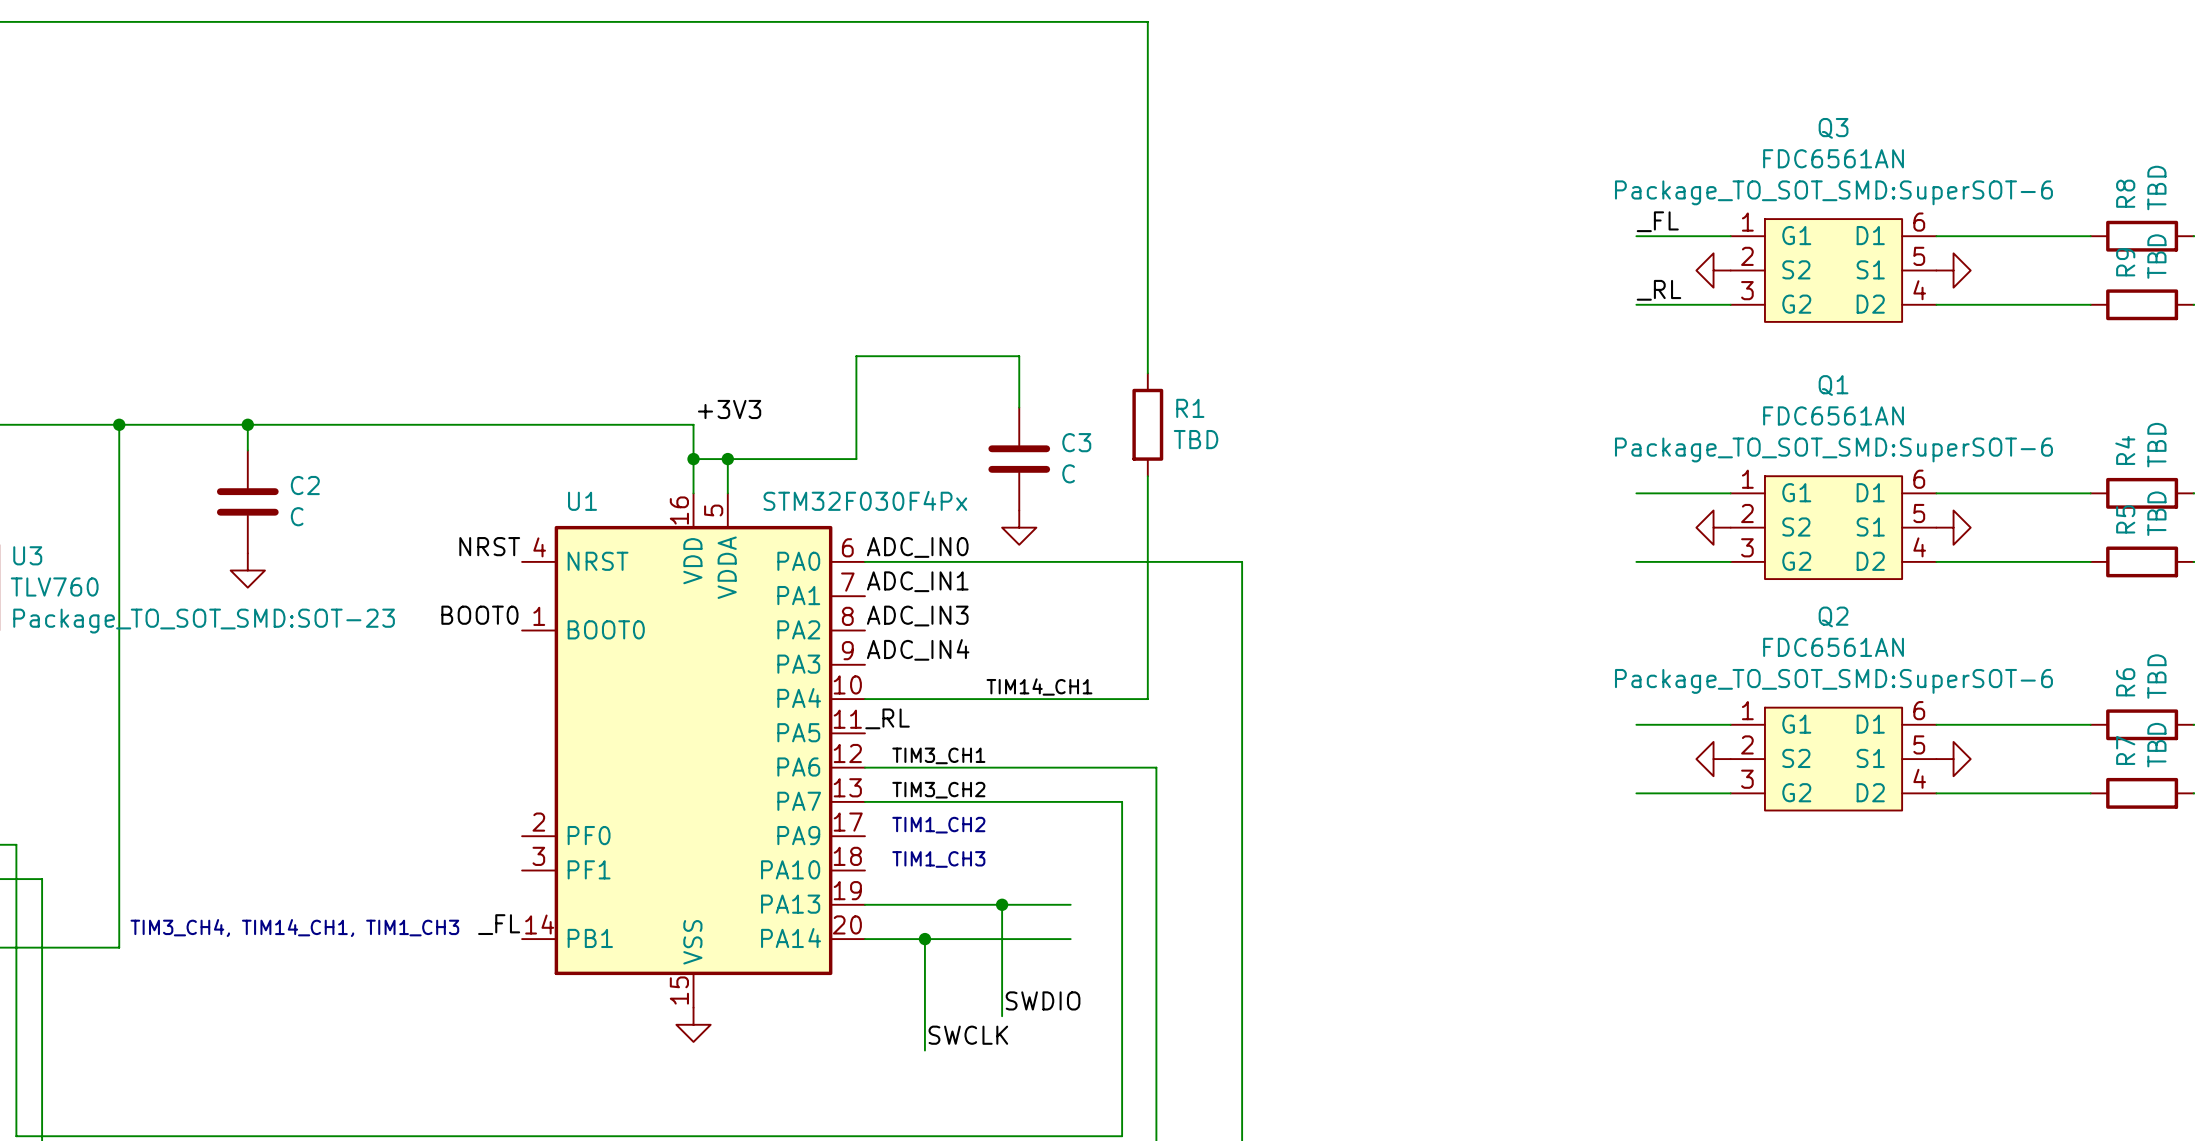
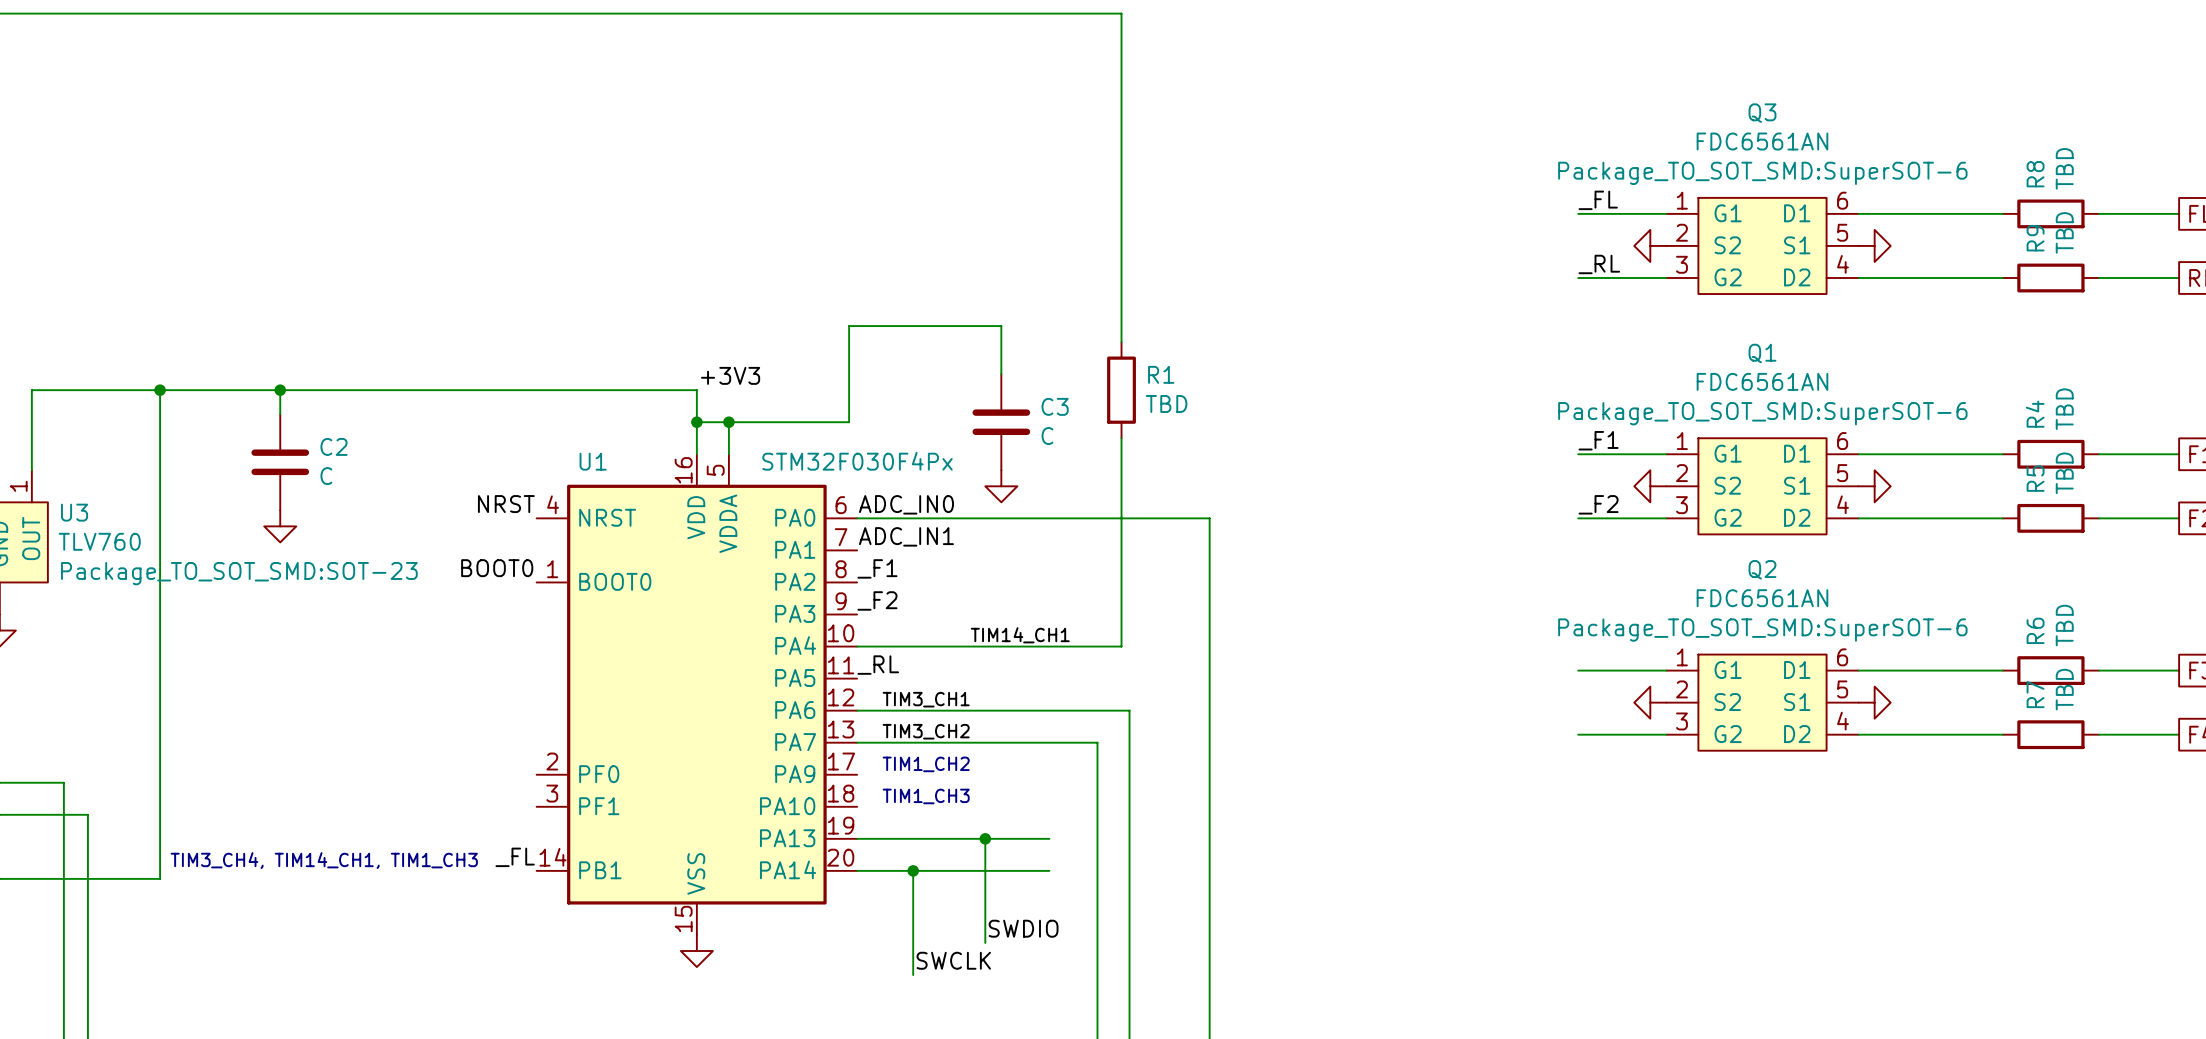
label: none -> _F1 (1598, 440)
label: none -> _F2 (1598, 504)
label: ADC_IN3 (917, 616) -> _F1 (877, 568)
label: ADC_IN4 (918, 649) -> _F2 (877, 600)

